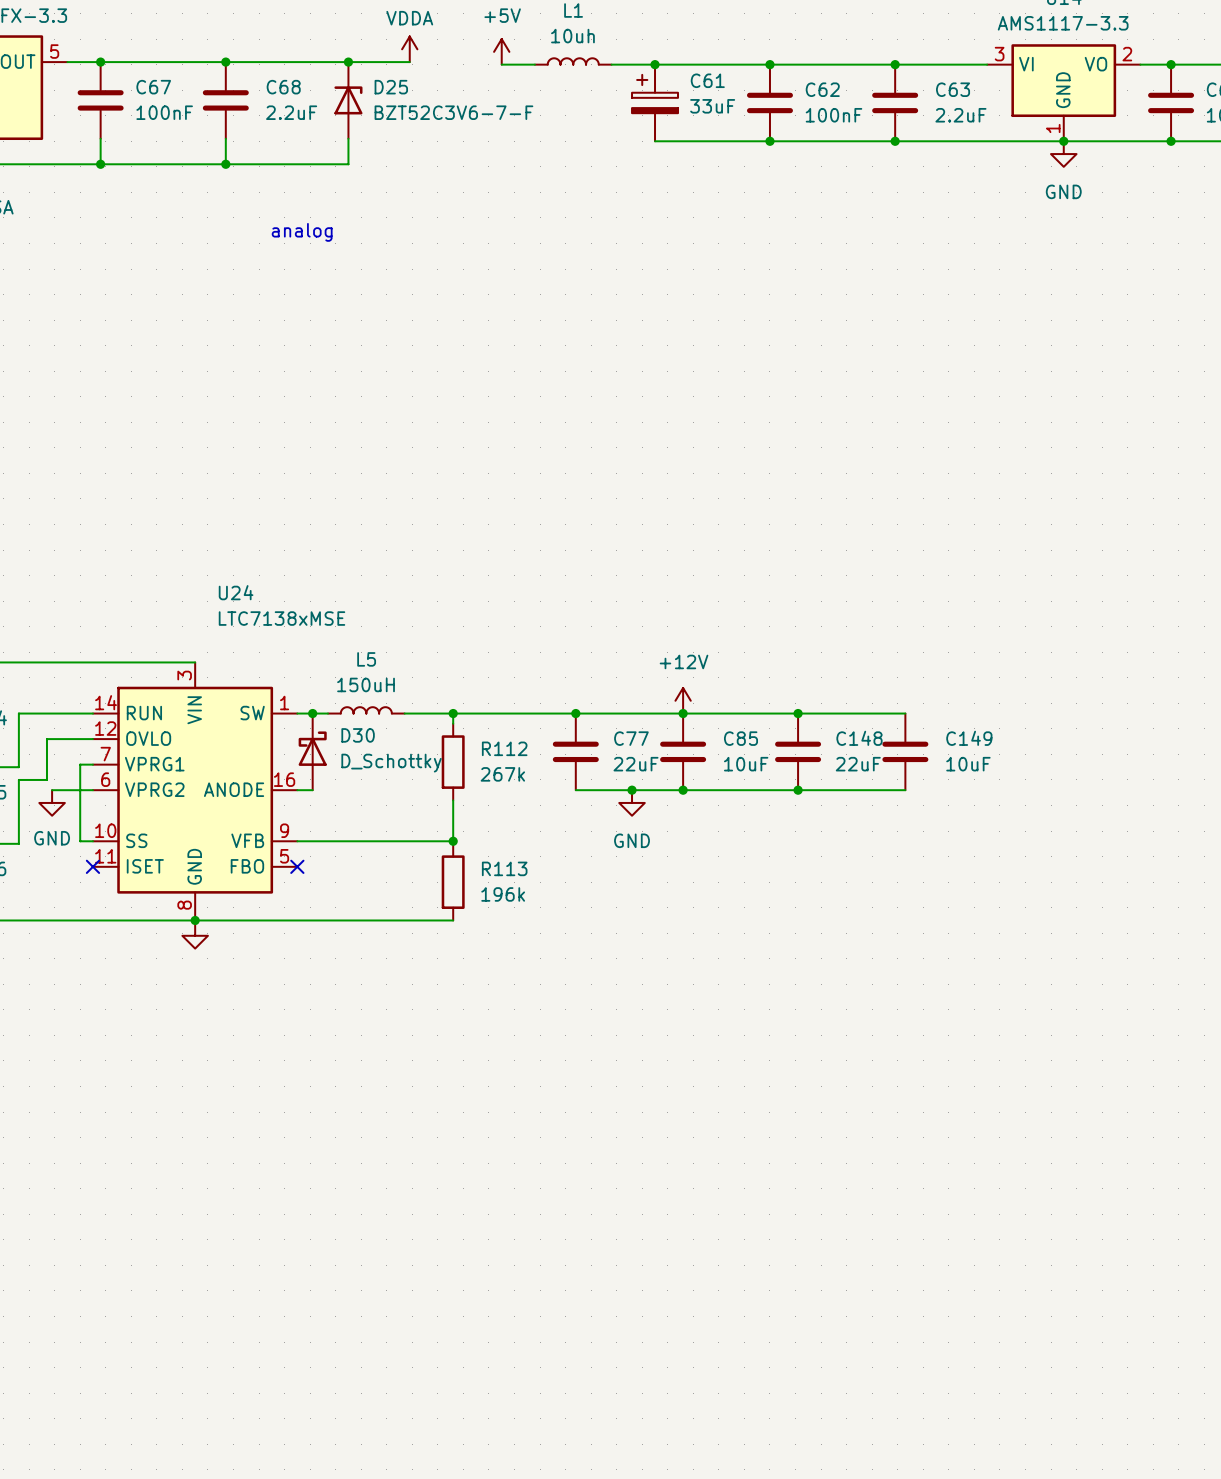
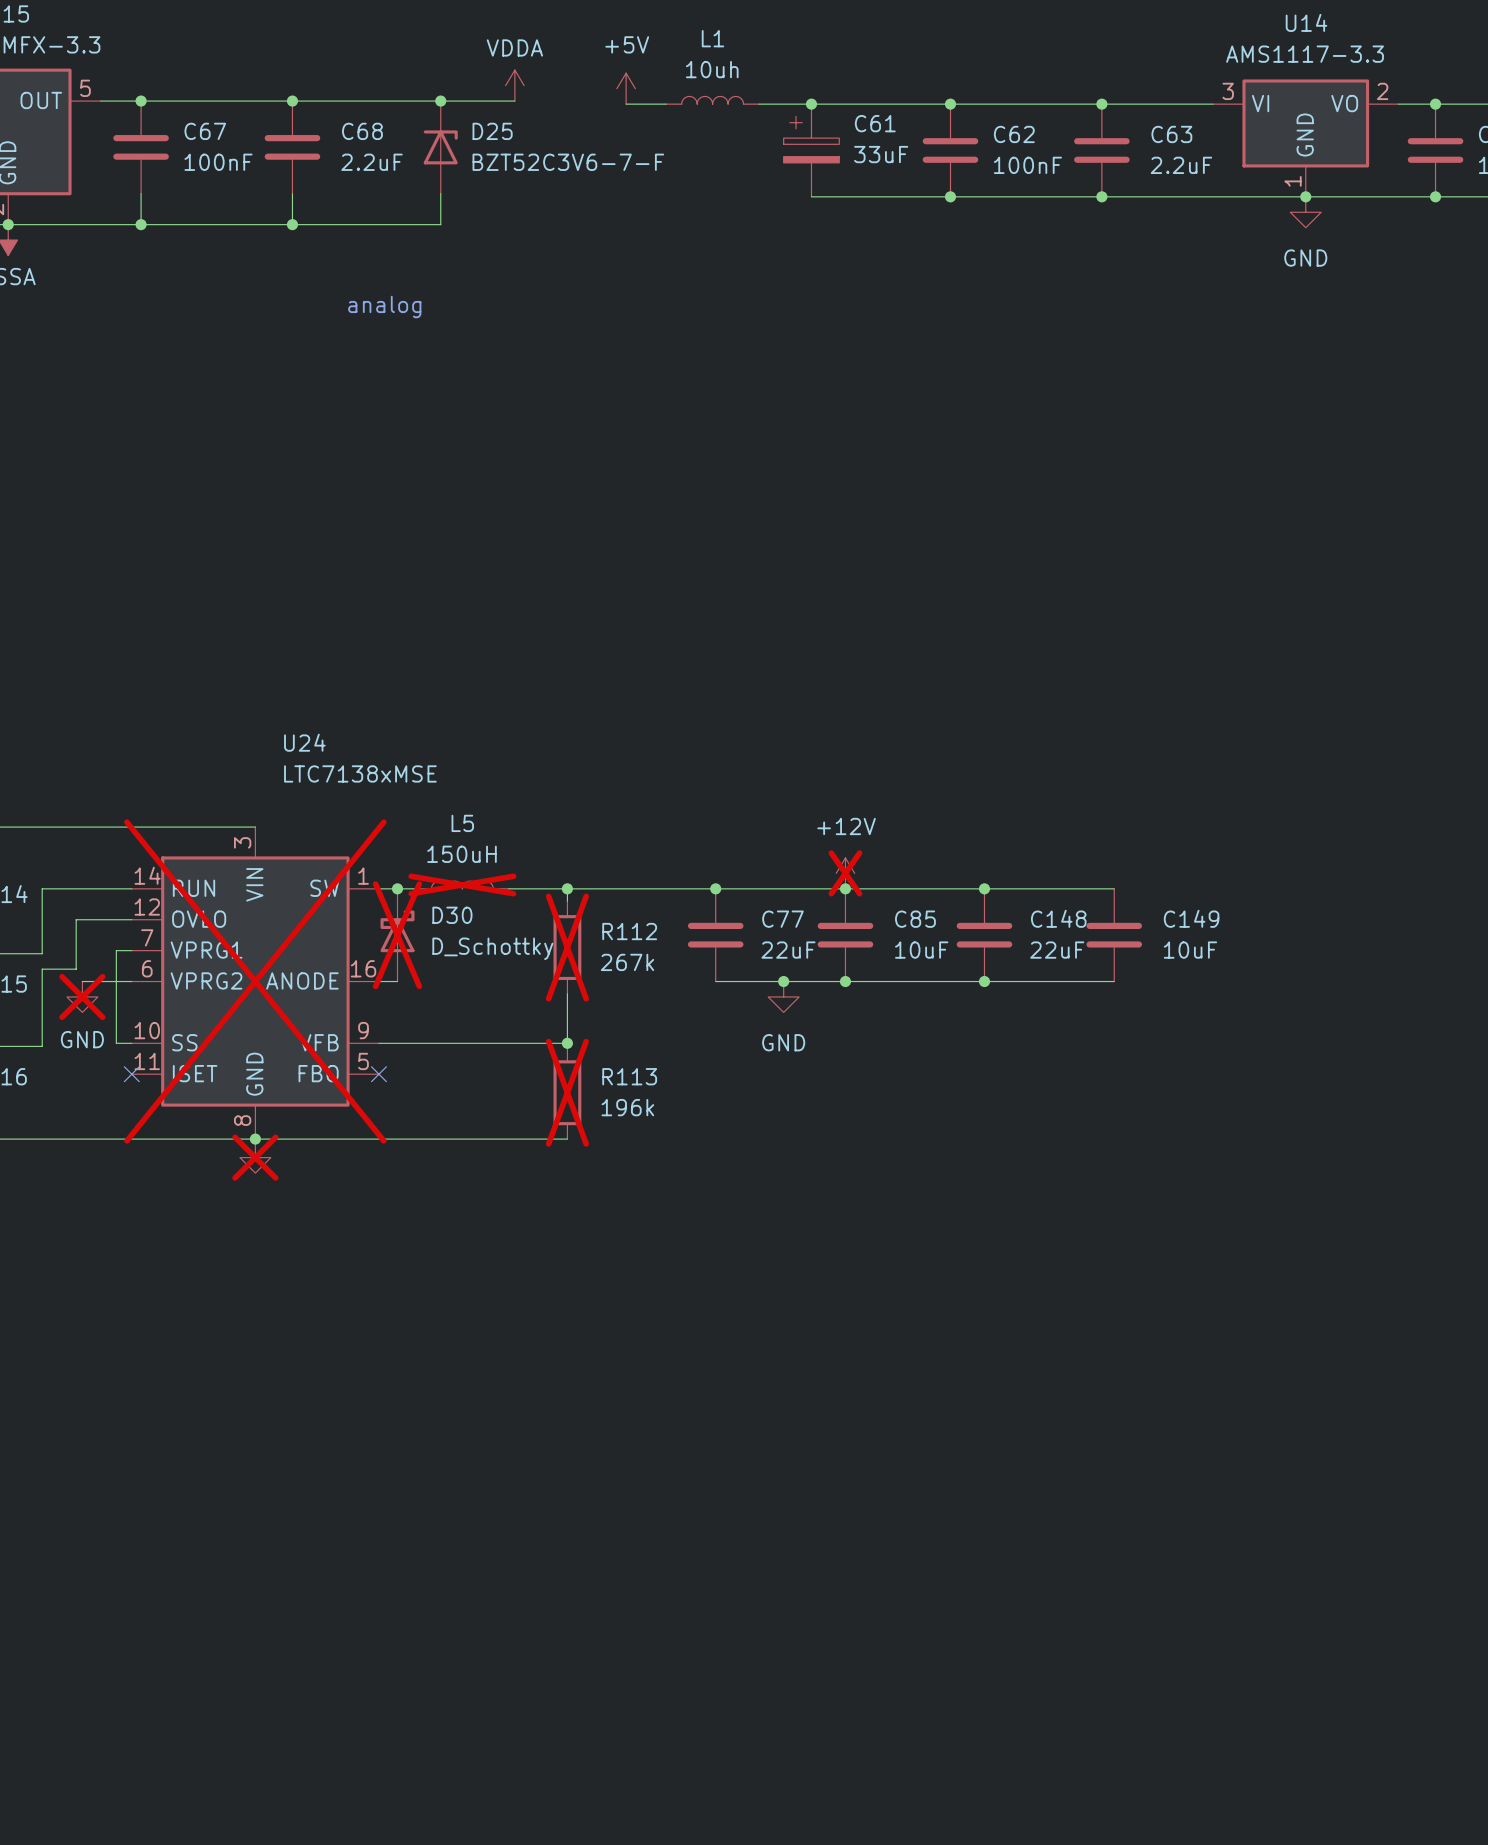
power symbol do-not-place cross: none -> (845, 873)
L5 do-not-place cross: none -> (462, 885)
D30 do-not-place cross: none -> (397, 935)
R112 do-not-place cross: none -> (567, 947)
U24 do-not-place cross: none -> (255, 981)
power symbol do-not-place cross: none -> (82, 996)
R113 do-not-place cross: none -> (567, 1092)
power symbol do-not-place cross: none -> (255, 1157)

